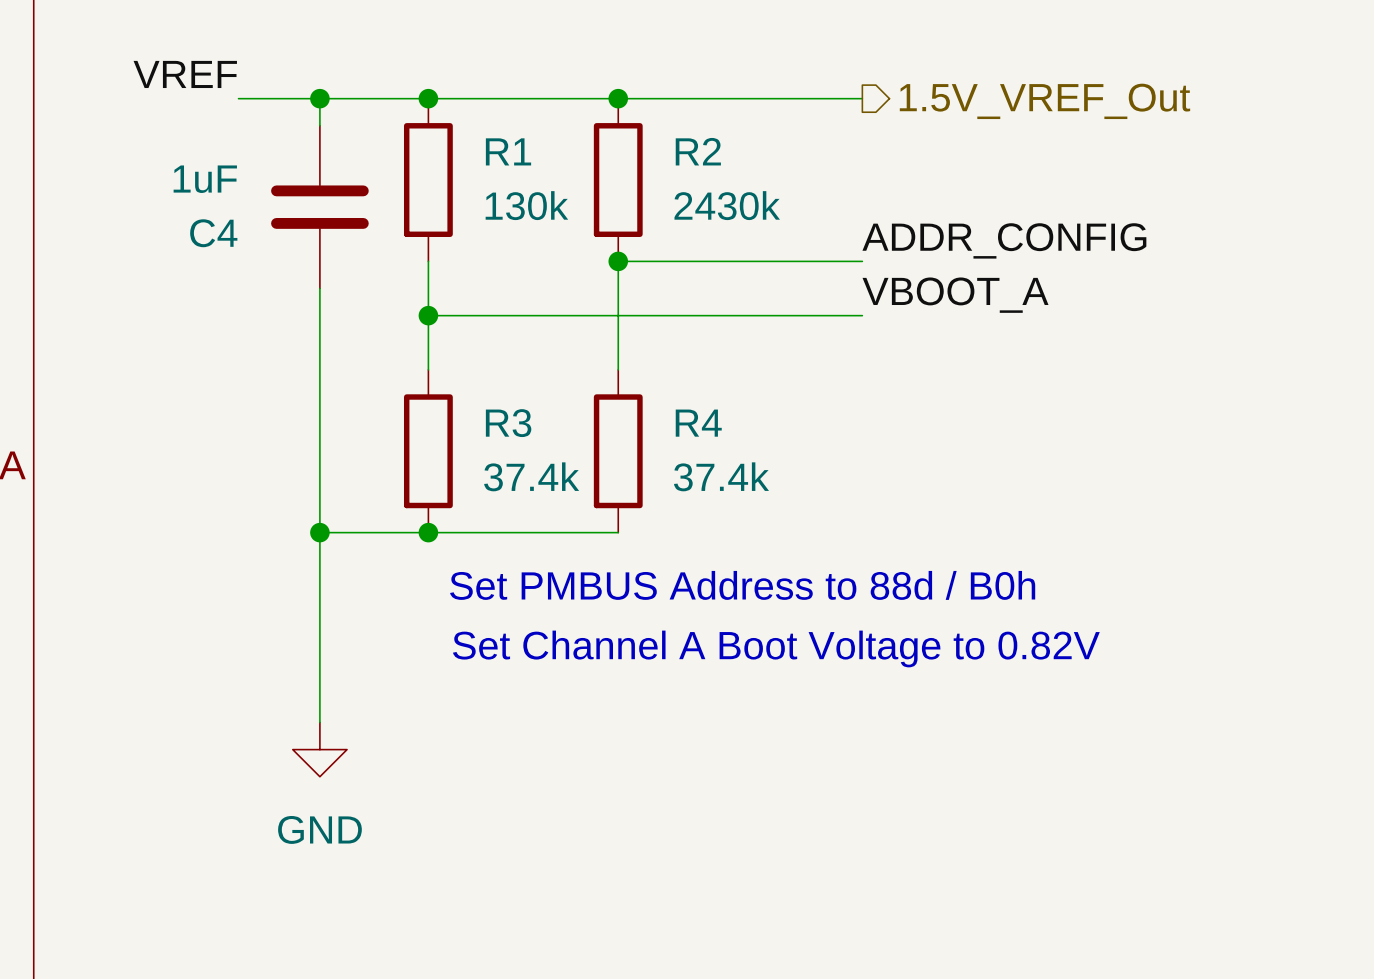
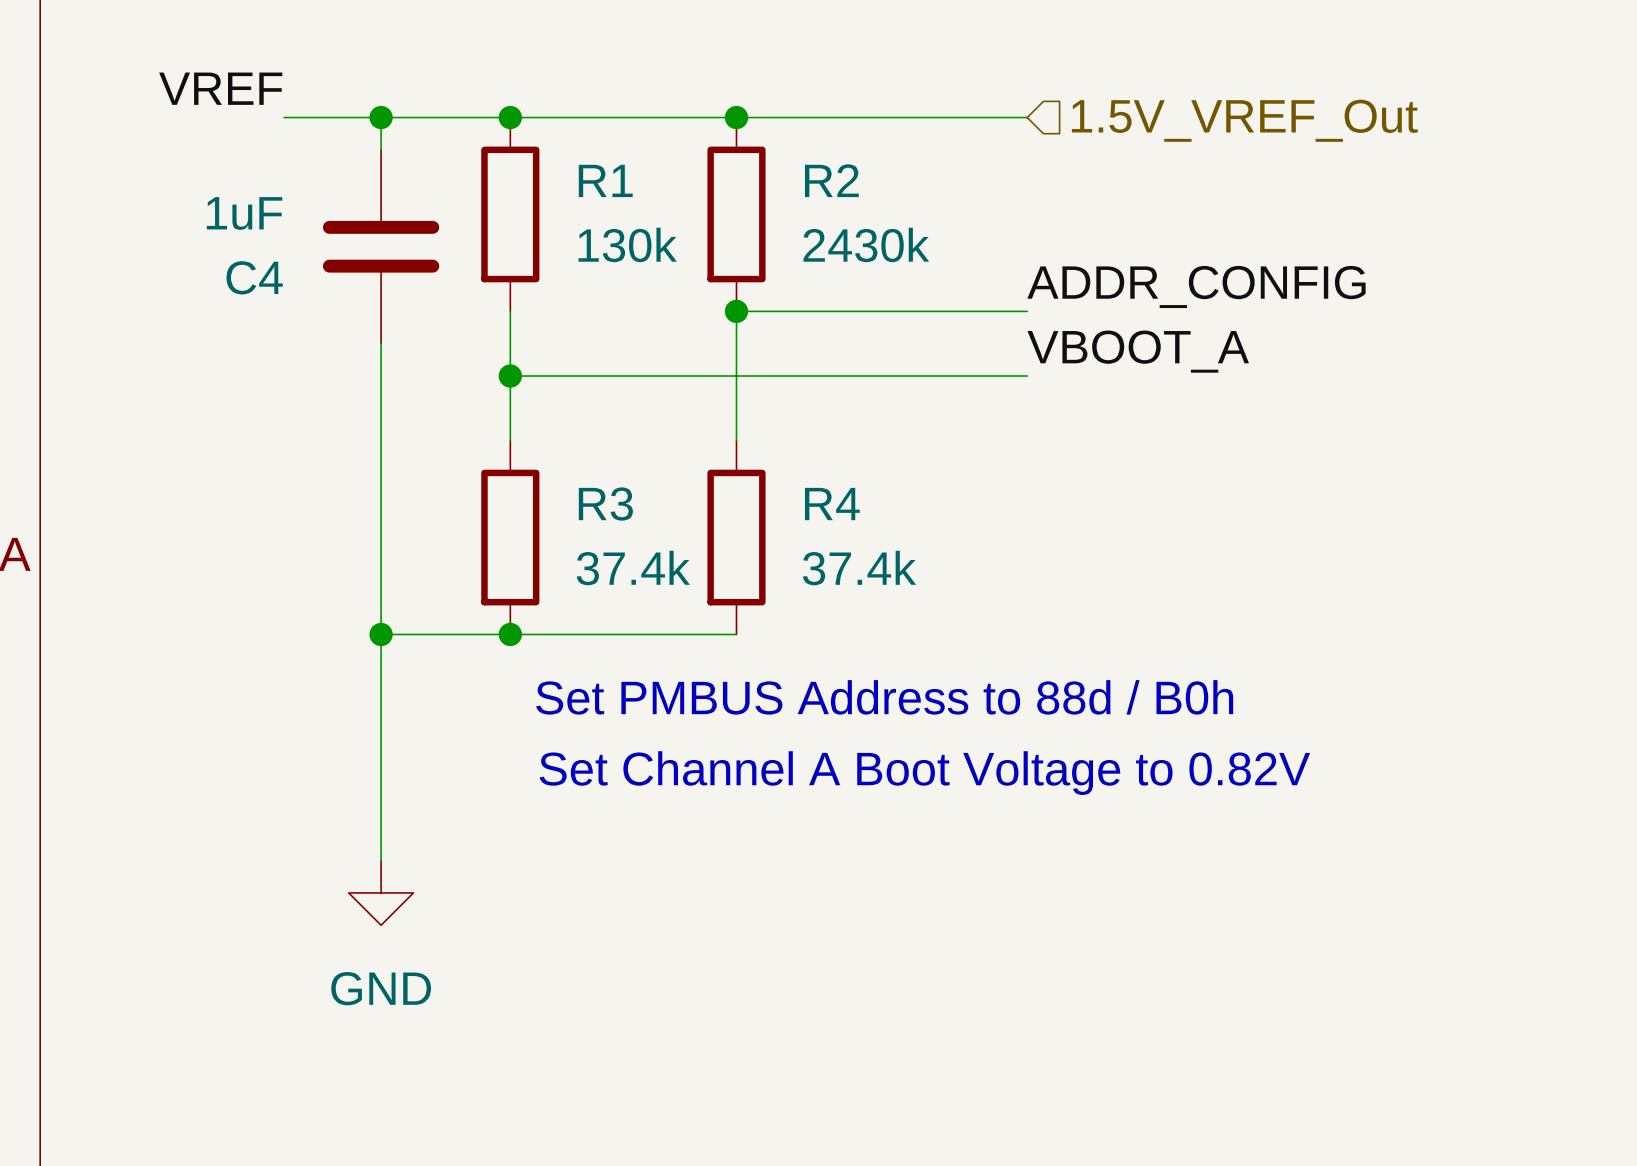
hierarchical label shape: output (1044, 101) -> input (1244, 120)

